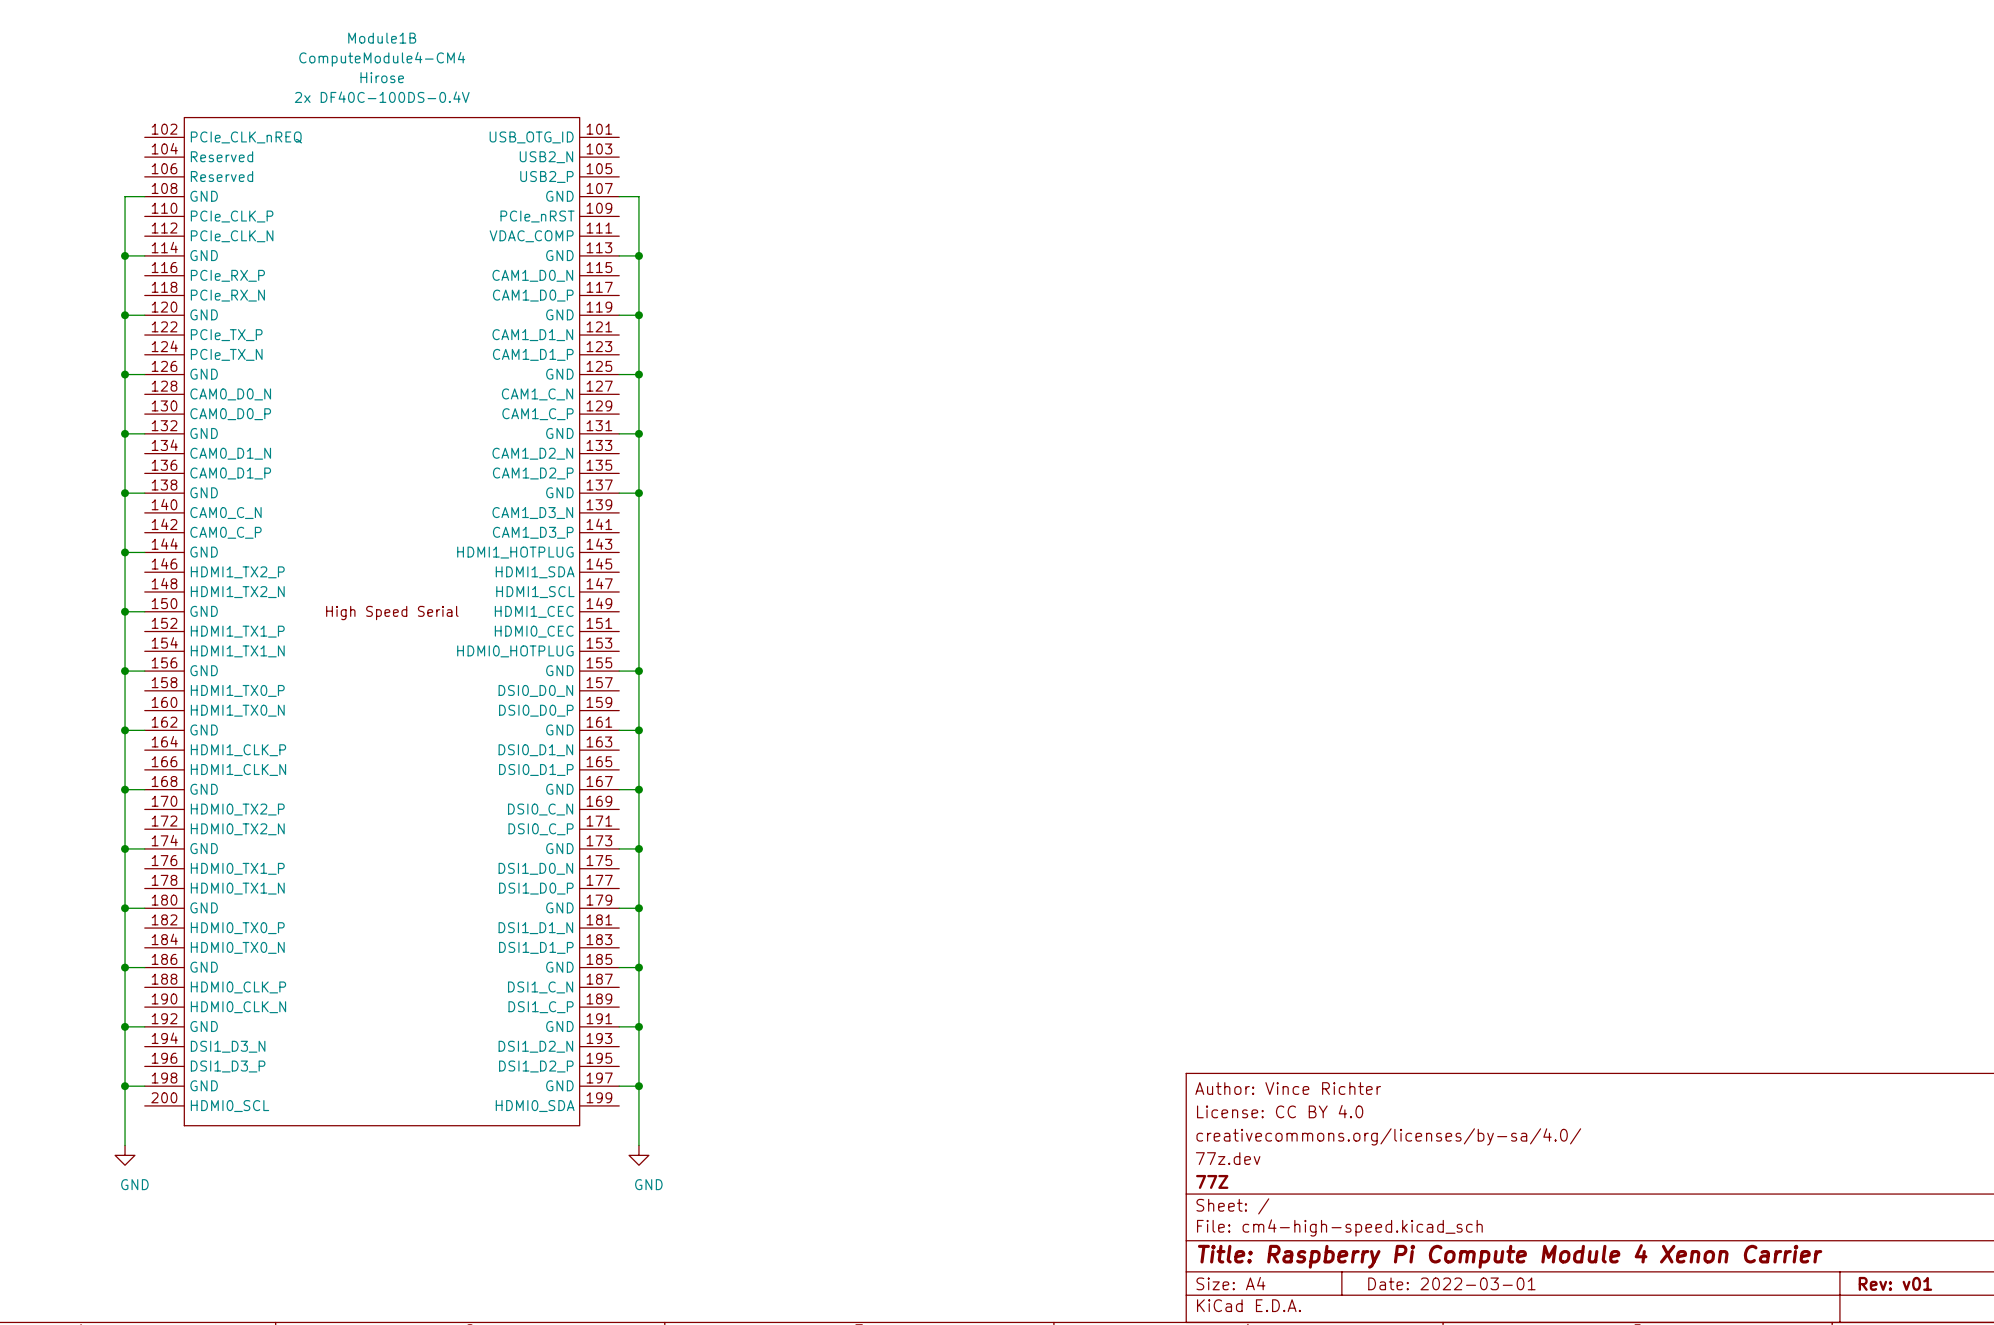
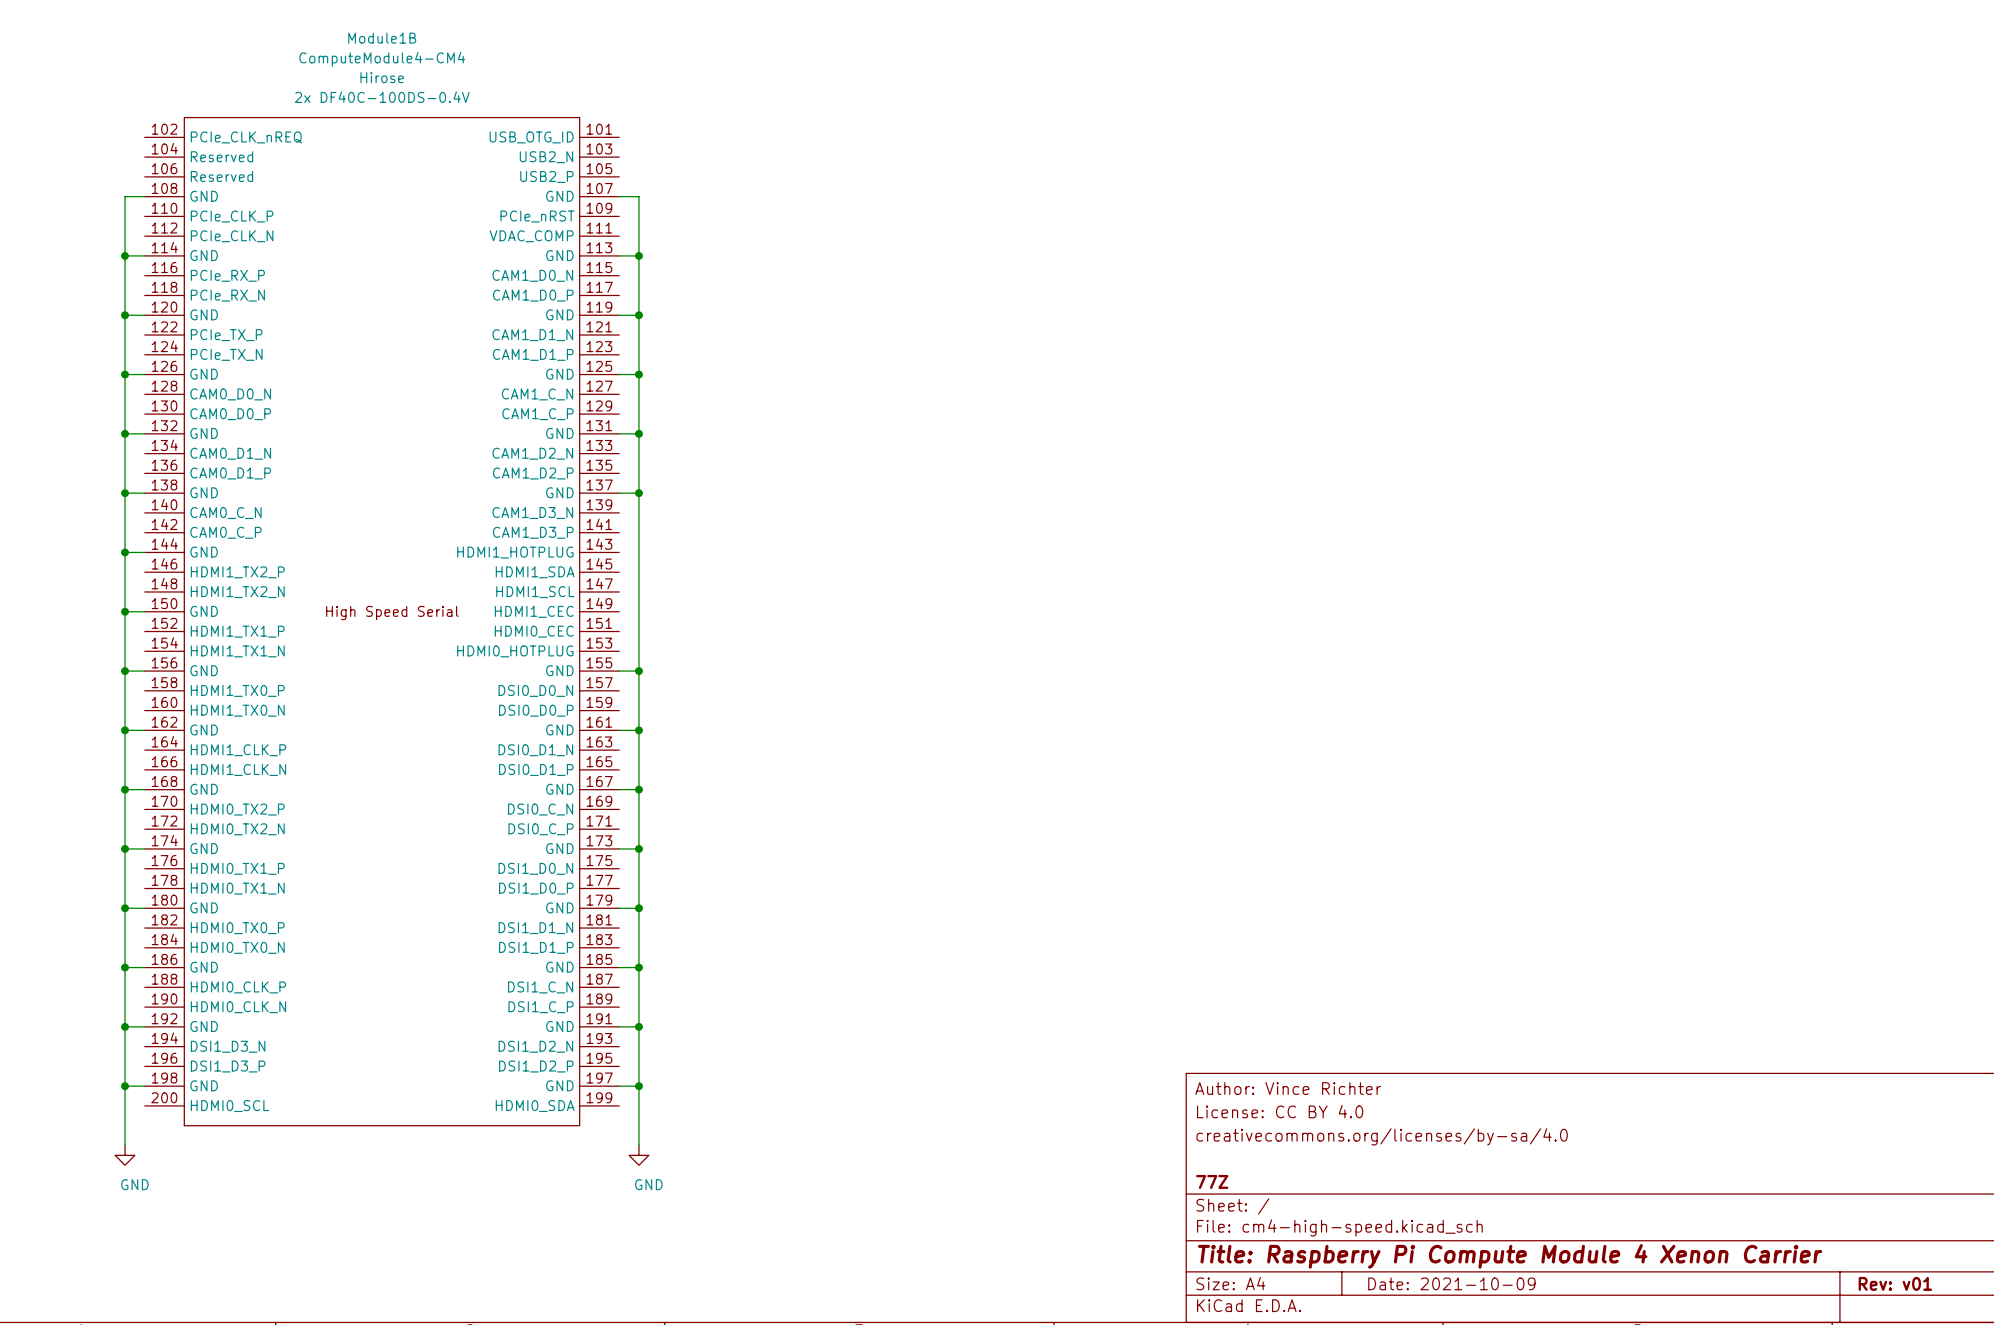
title block: creativecommons.org/licenses/by-sa/4.0/ (1388, 1136) -> creativecommons.org/licenses/by-sa/4.0 (1382, 1136)
title block: 77z.dev (1228, 1158) -> none
title block: Date: 2022-03-01 (1451, 1283) -> Date: 2021-10-09 (1451, 1283)

